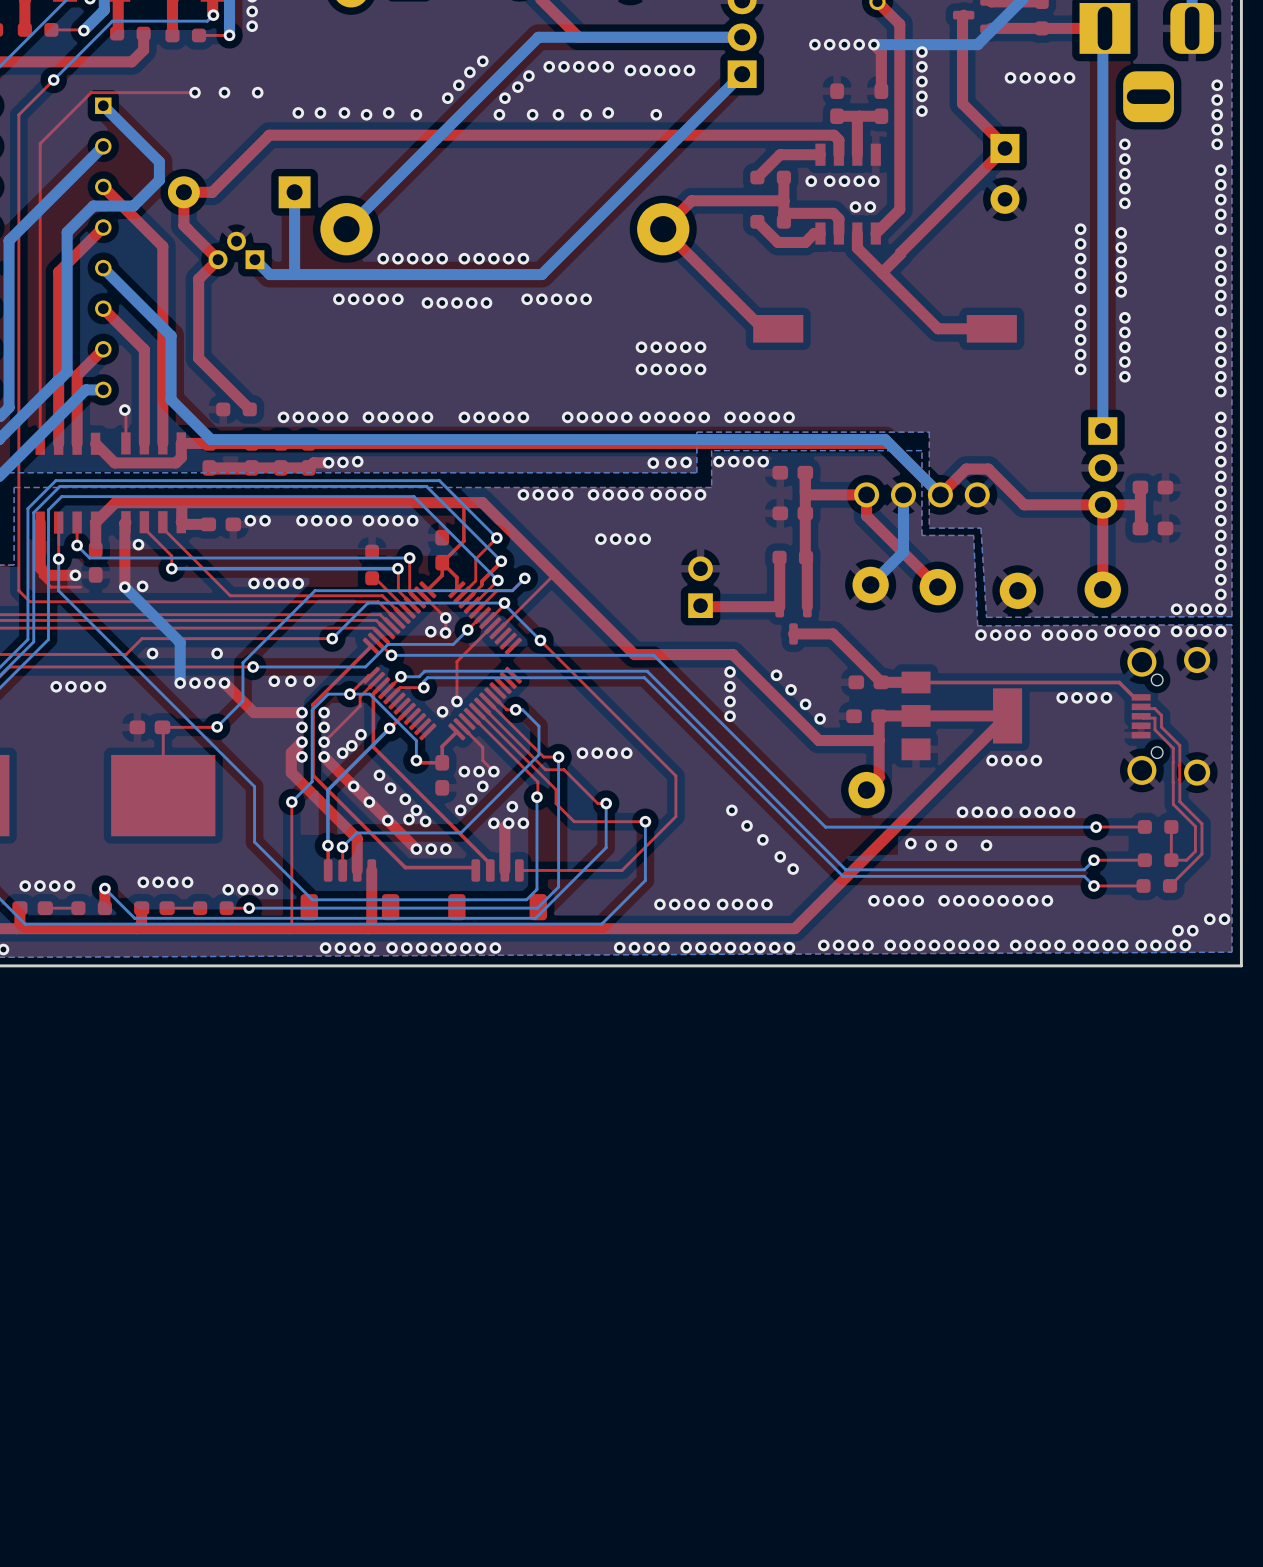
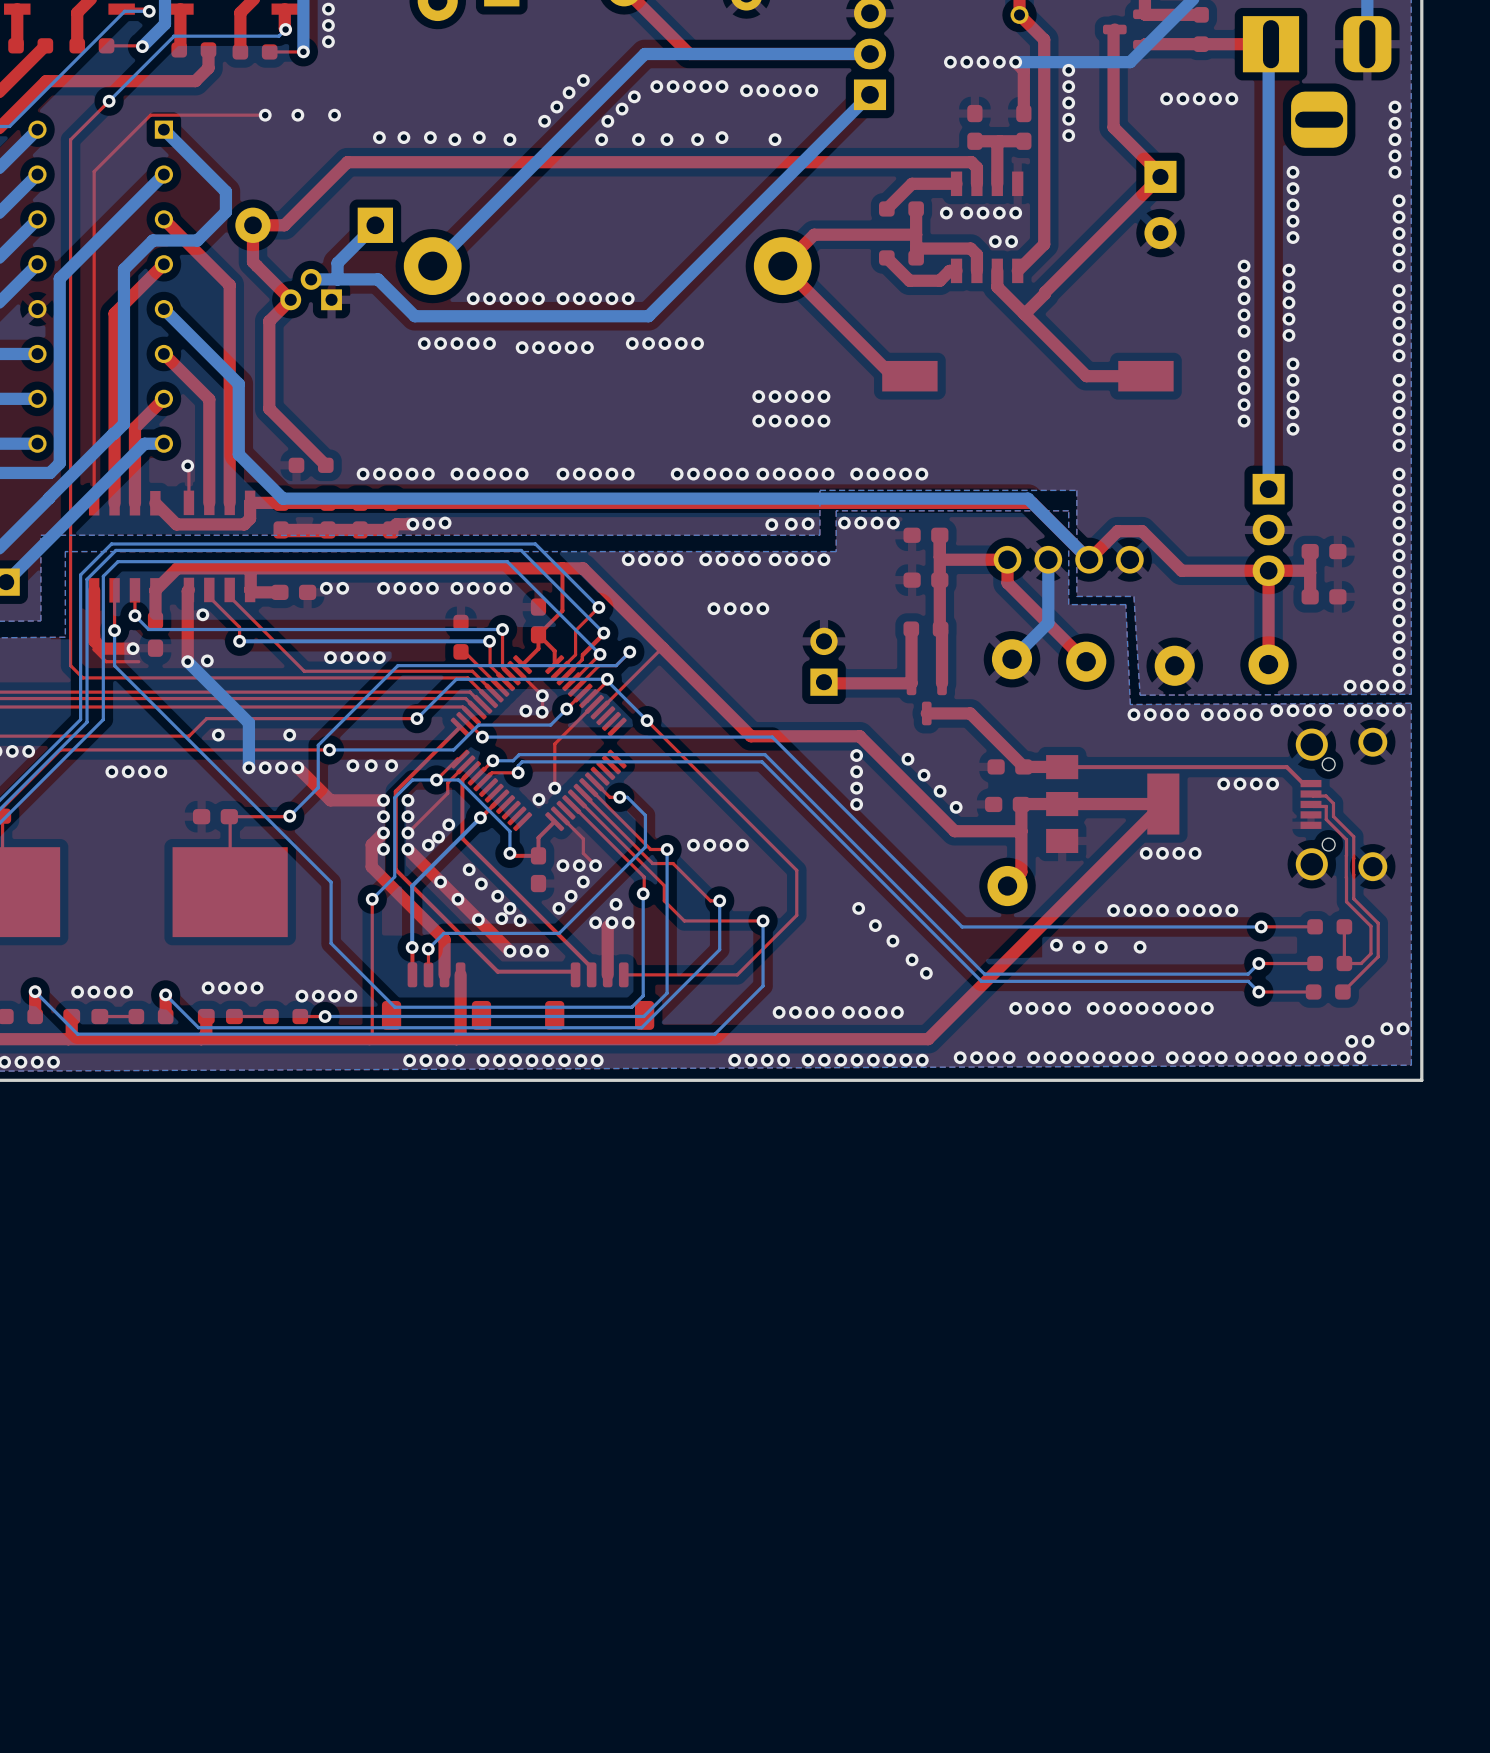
bottom track: none -> (375, 225) (337, 263) (337, 279)
bottom track: (294, 220) (294, 192) (294, 274) -> none
bottom track: (254, 259) (269, 274) (330, 274) -> (311, 279) (378, 279) (414, 316)

